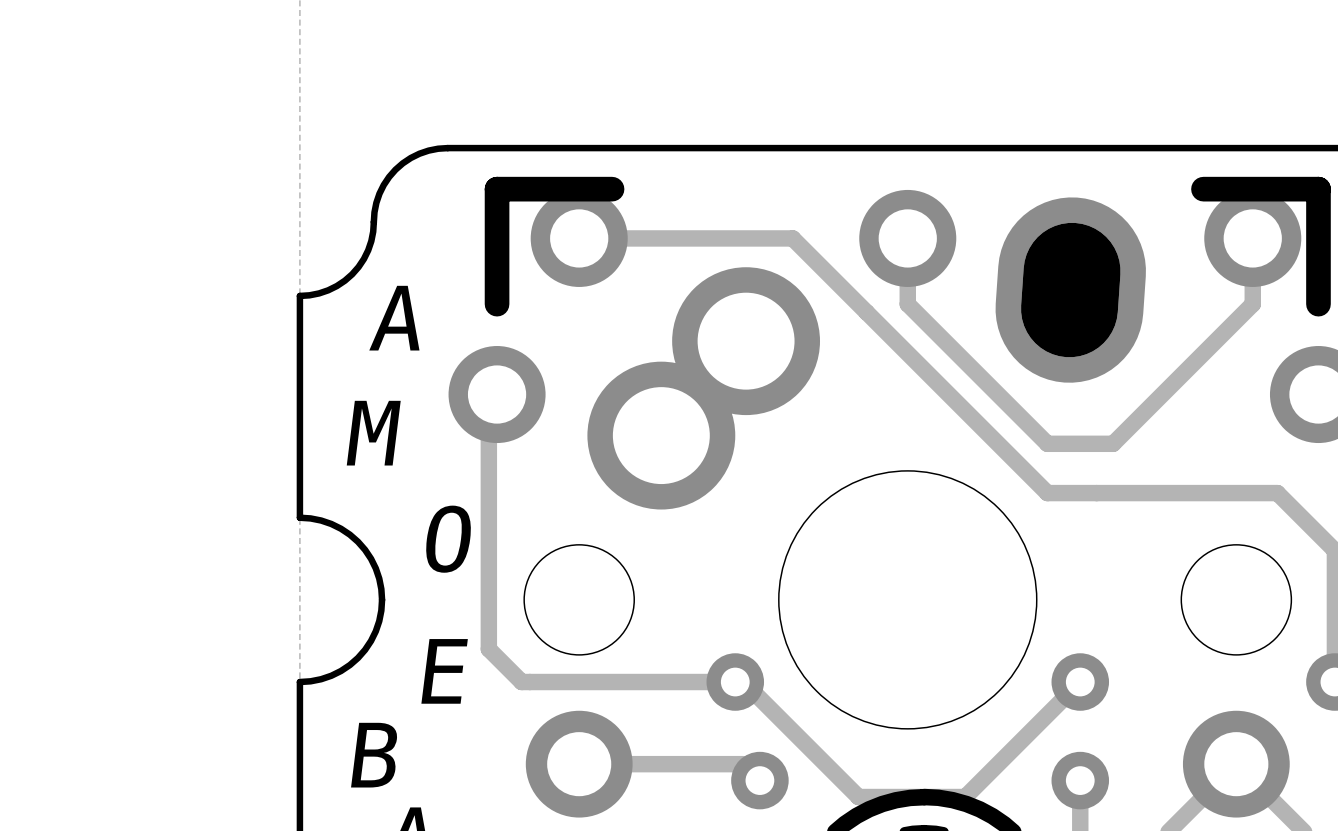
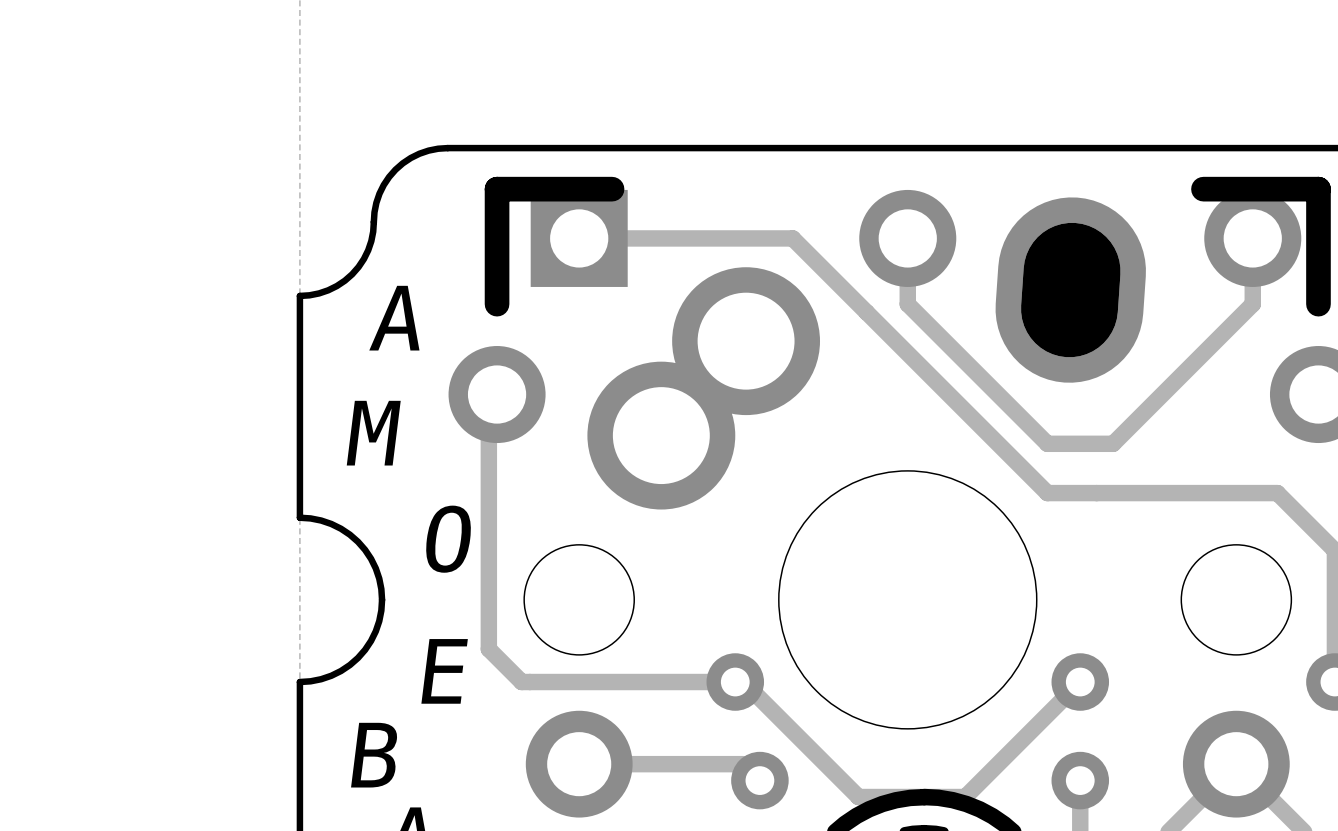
part footprint: [530, 189, 628, 287] -> [530, 189, 628, 287]

